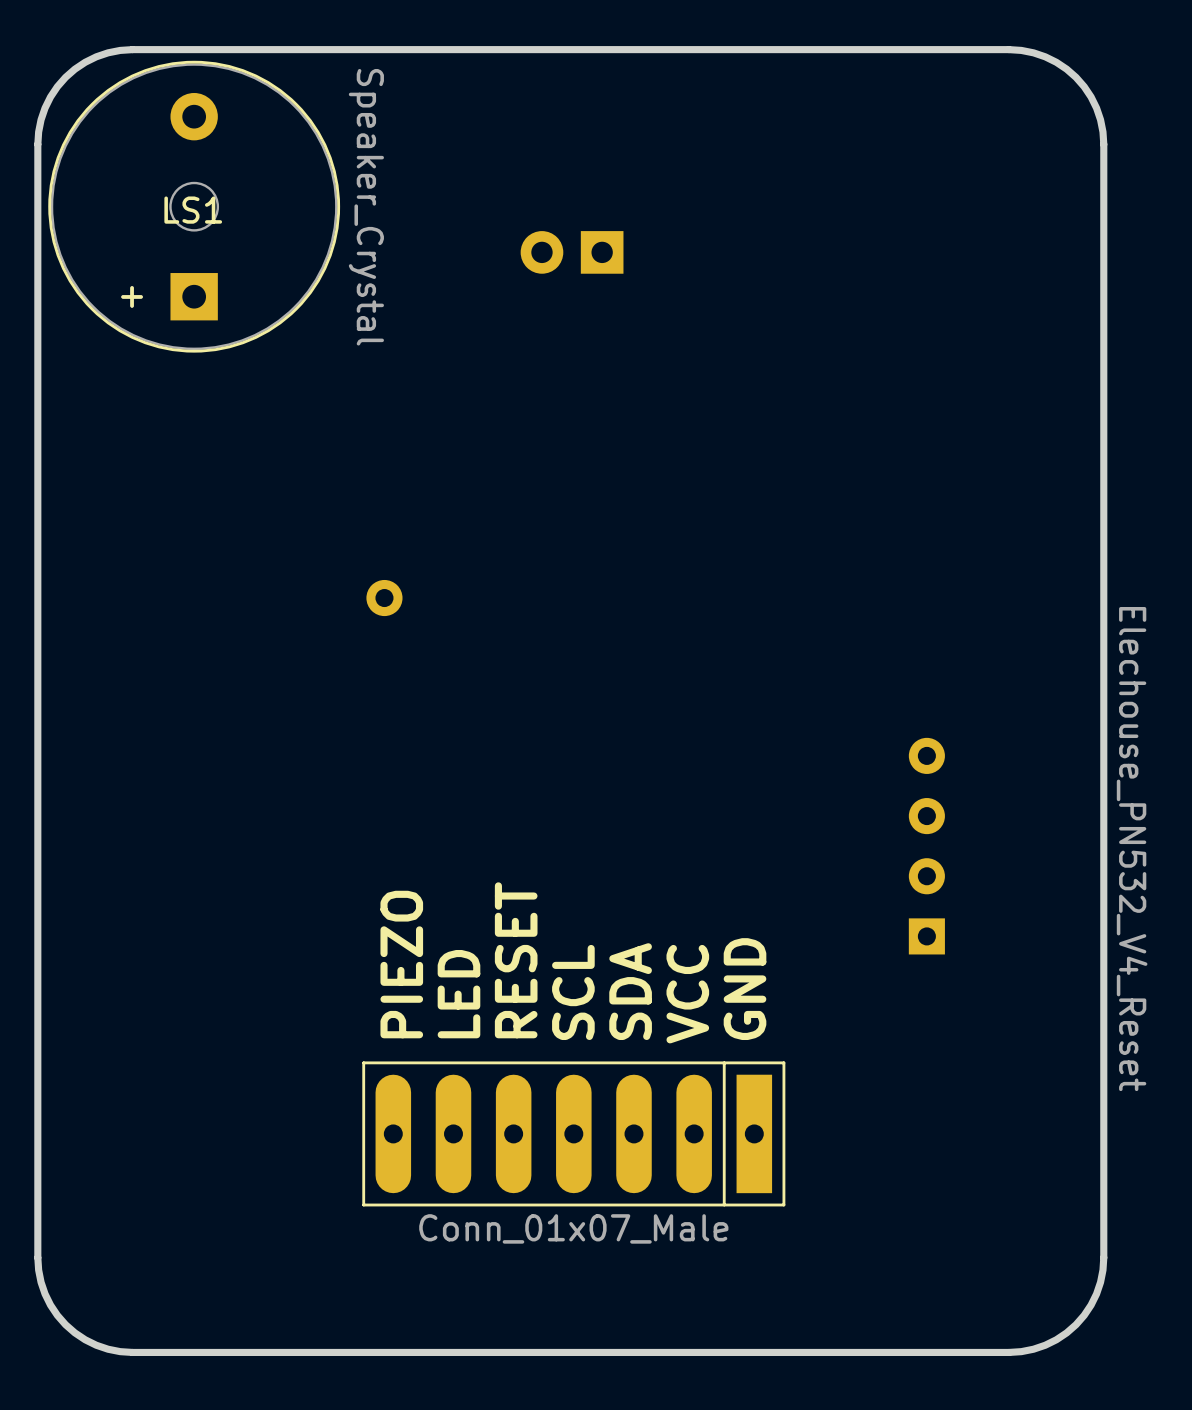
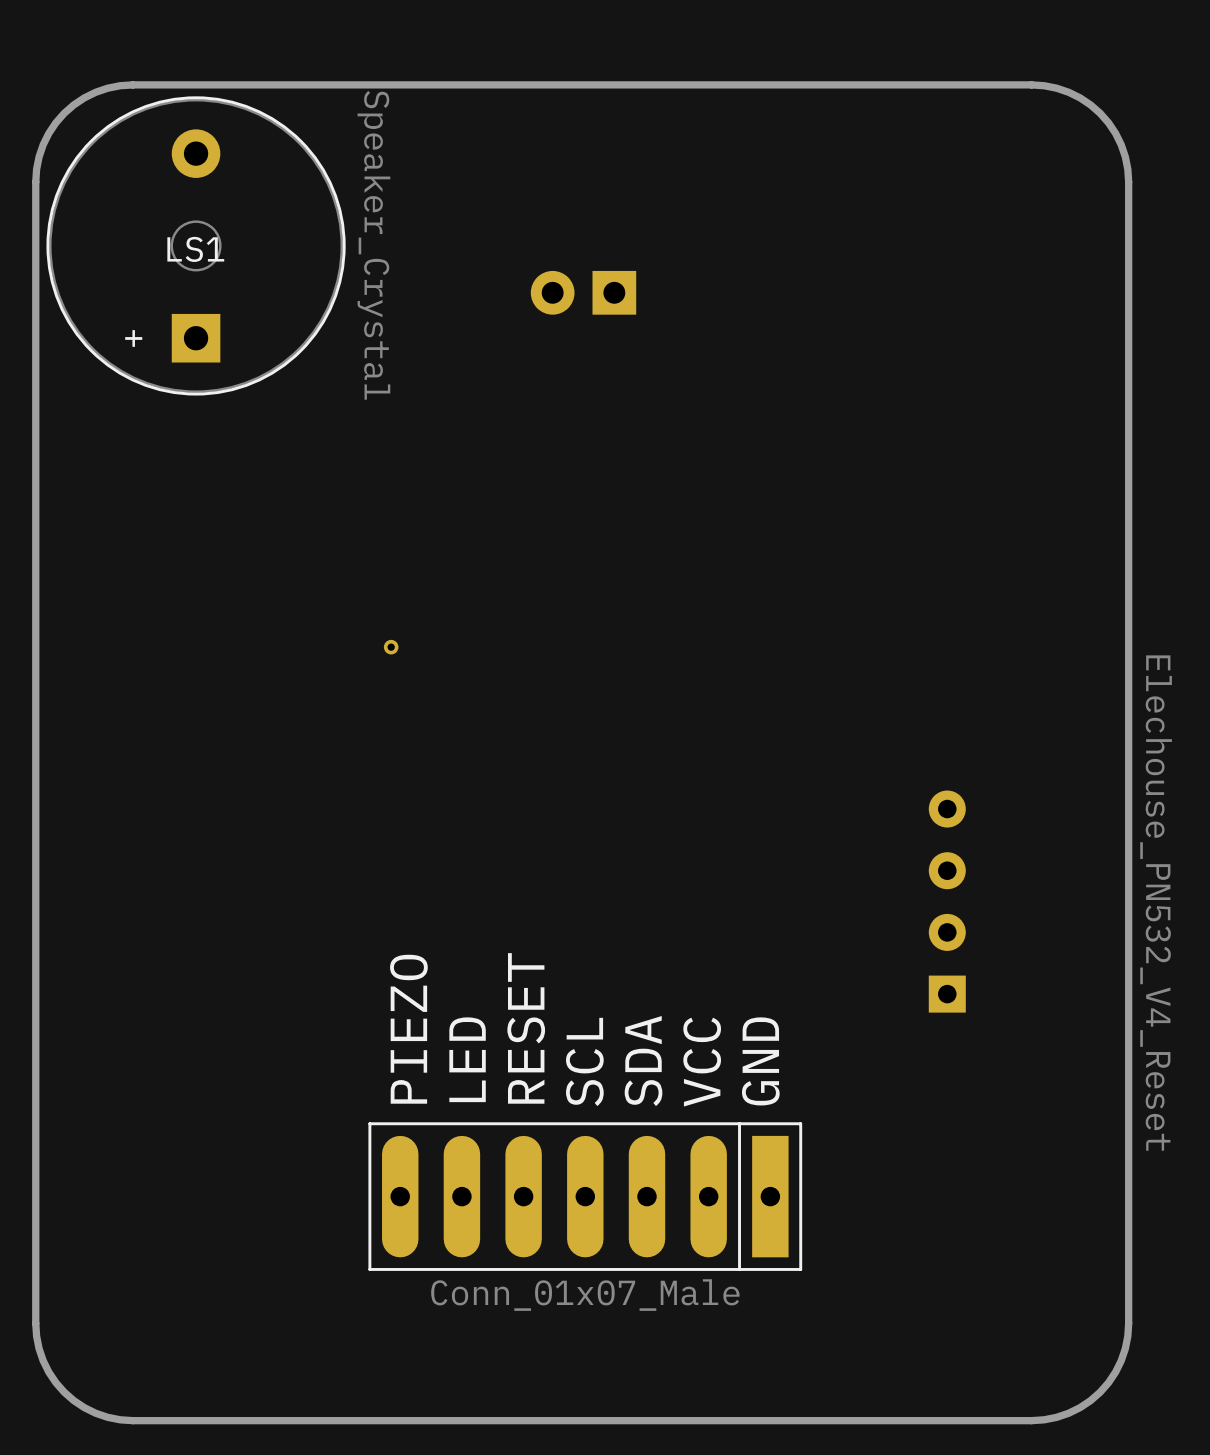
part footprint: [366, 579, 945, 955] -> [383, 639, 966, 1013]

